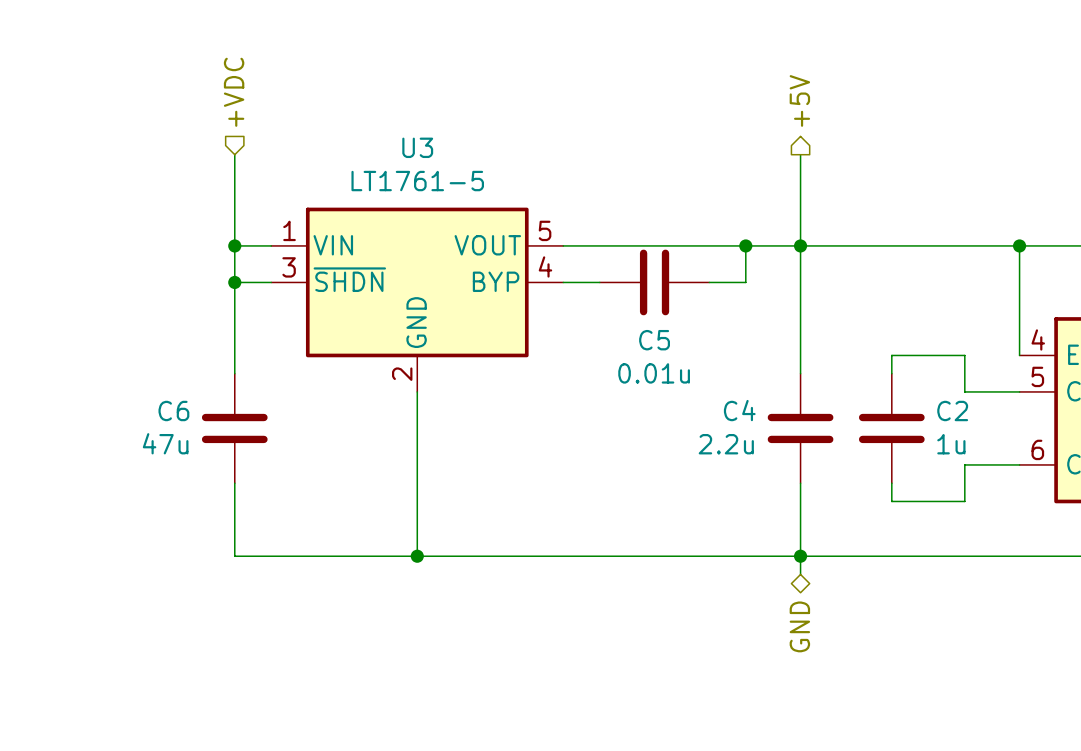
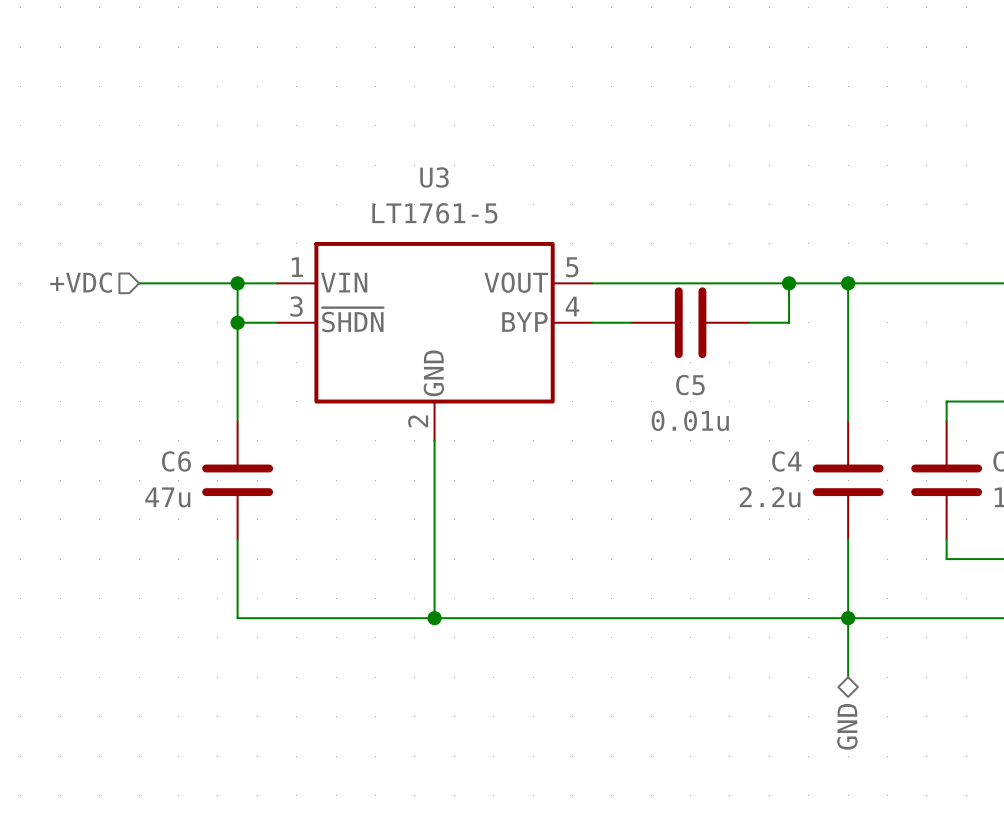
hierarchical label rotation: 0° (234, 92) -> 90° counterclockwise (81, 282)
hierarchical label position: +VDC (234, 92) -> +VDC (81, 282)
hierarchical label: +5V (799, 100) -> none
wire: (234, 154) (234, 245) -> (139, 283) (237, 283)
wire: (800, 154) (800, 245) -> none
wire: none -> (848, 637) (848, 677)
hierarchical label position: GND (799, 626) -> GND (847, 726)

